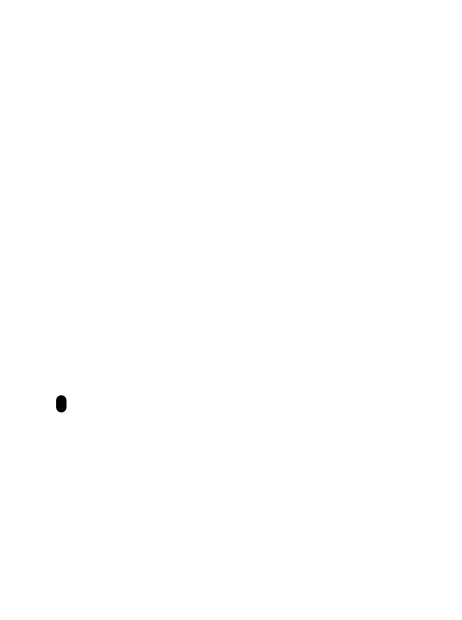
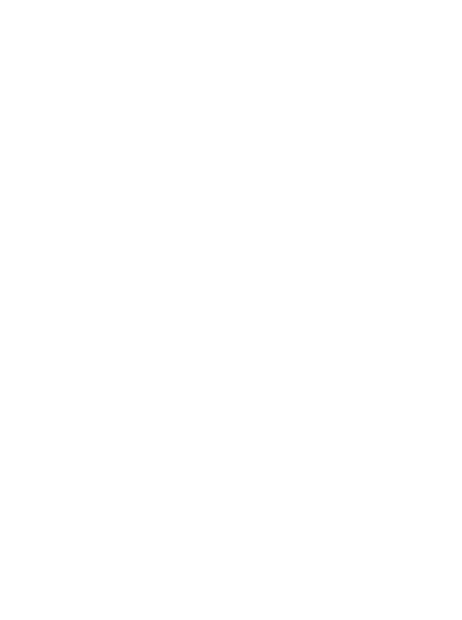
board edge: (61, 400) (61, 407) -> none

